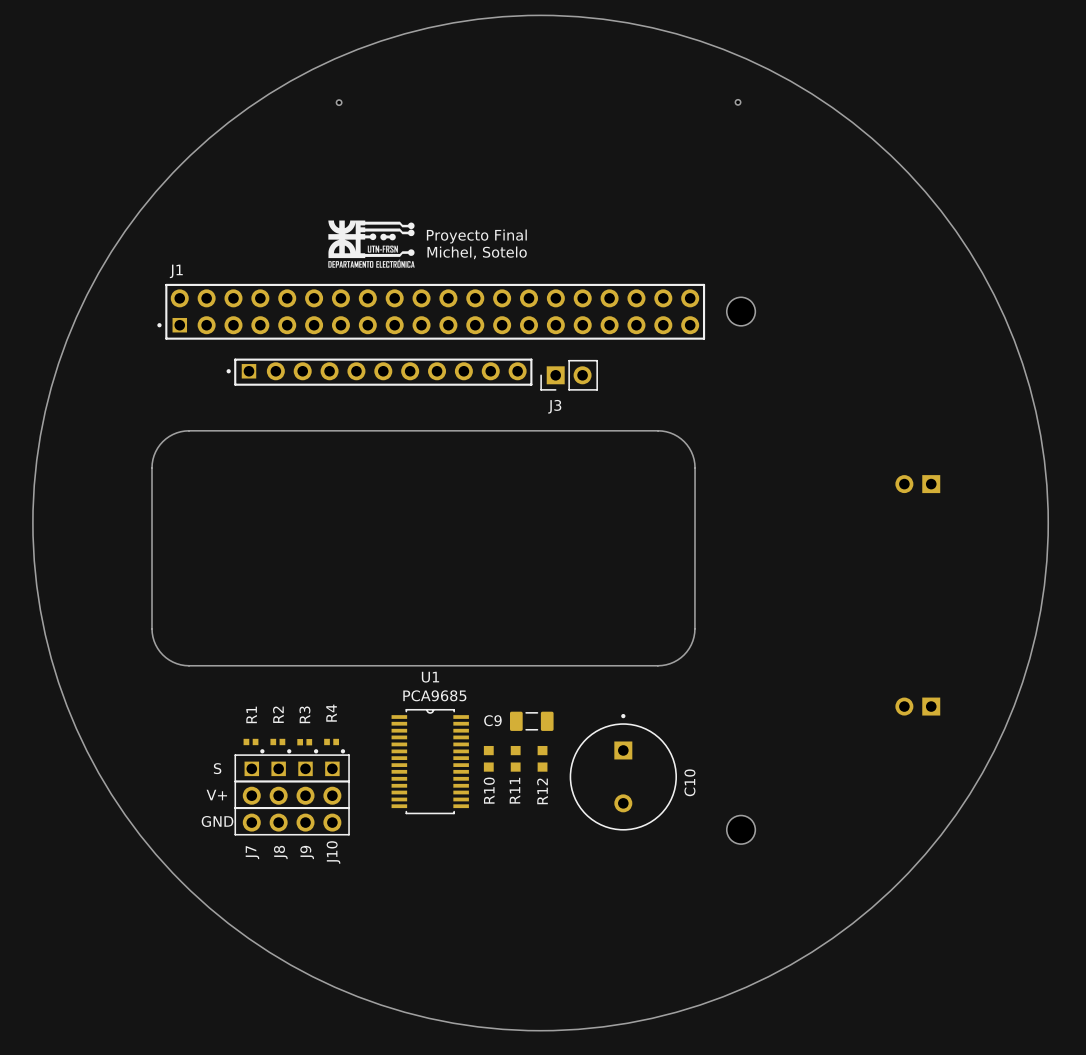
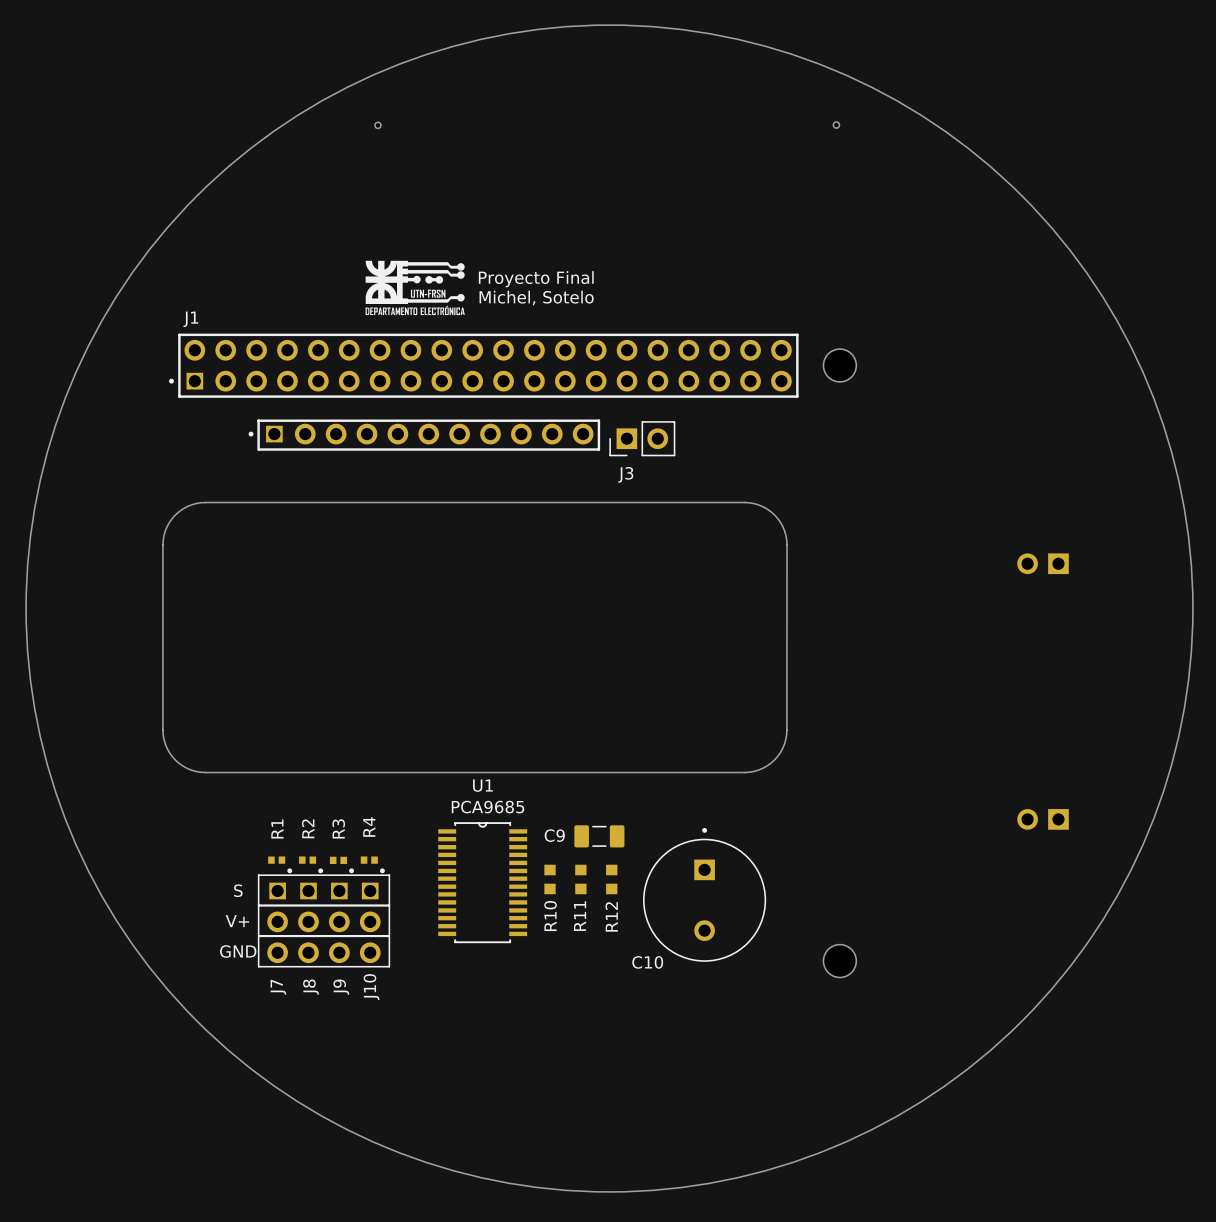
C10 name rotation: 0° (689, 782) -> 90° clockwise (647, 962)
C10 name position: C10 (689, 782) -> C10 (647, 962)

